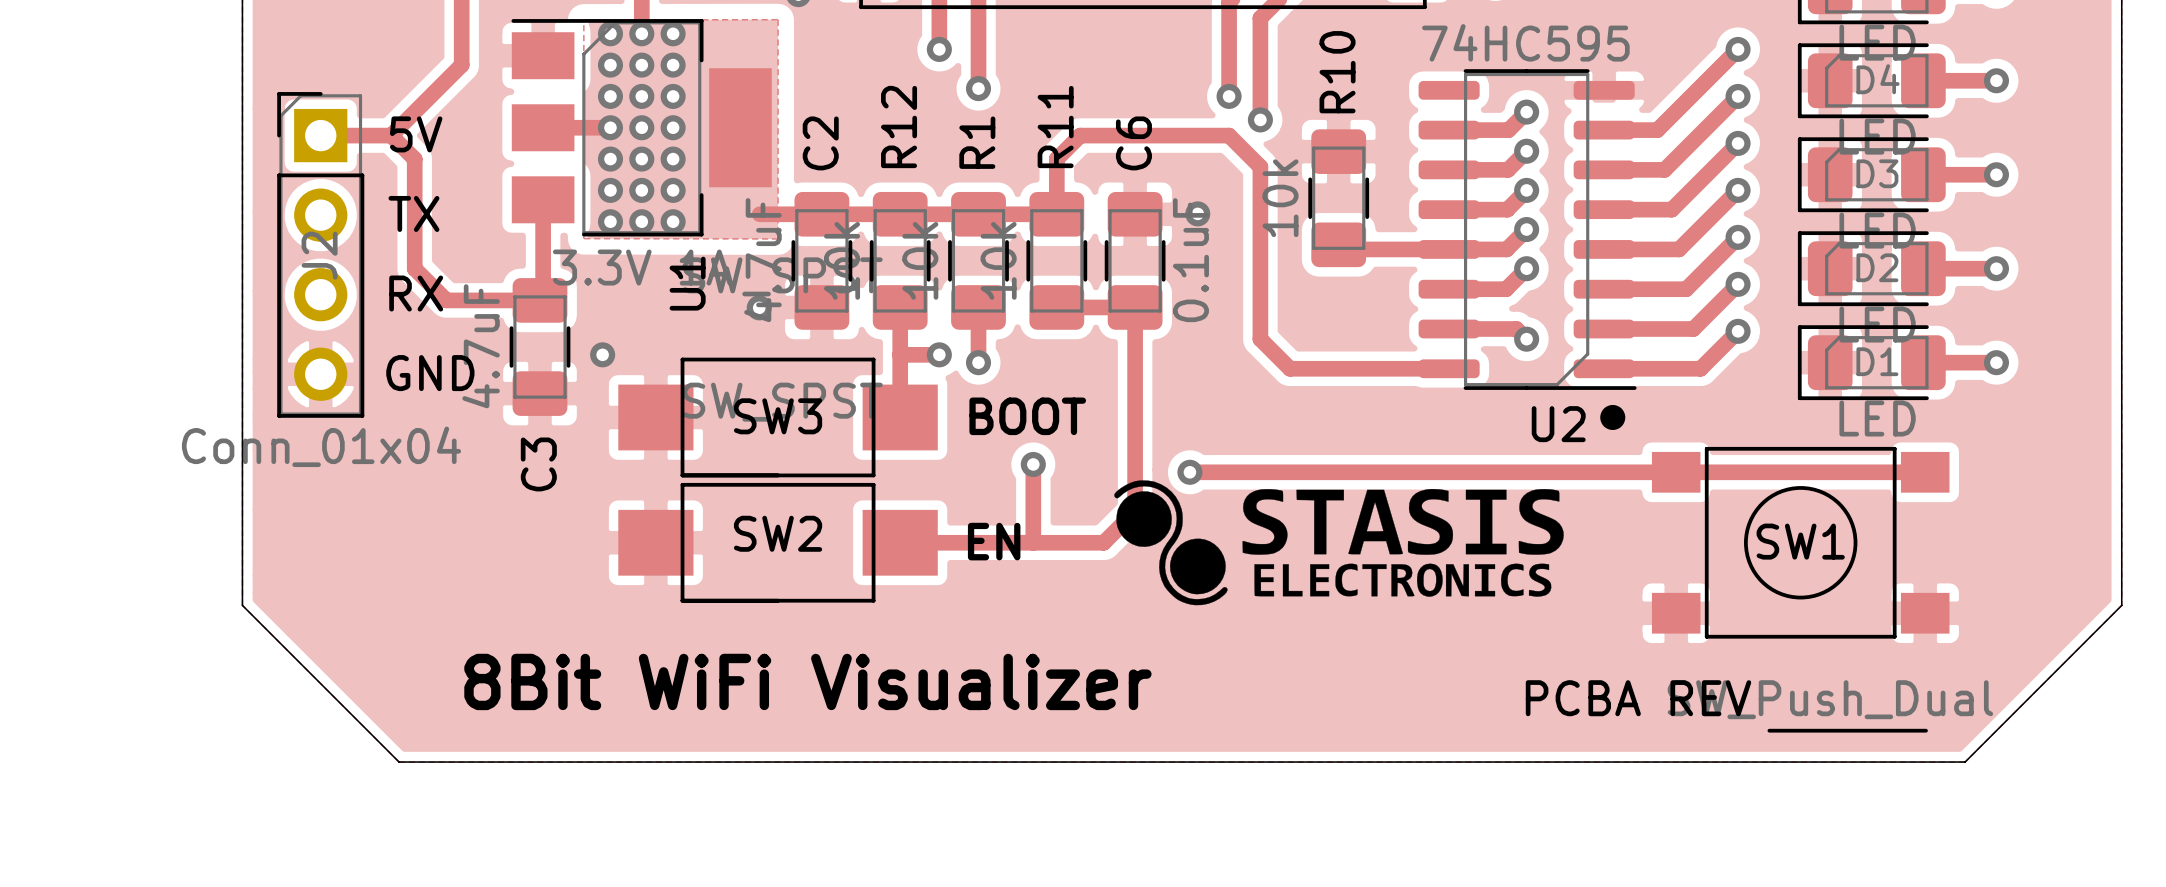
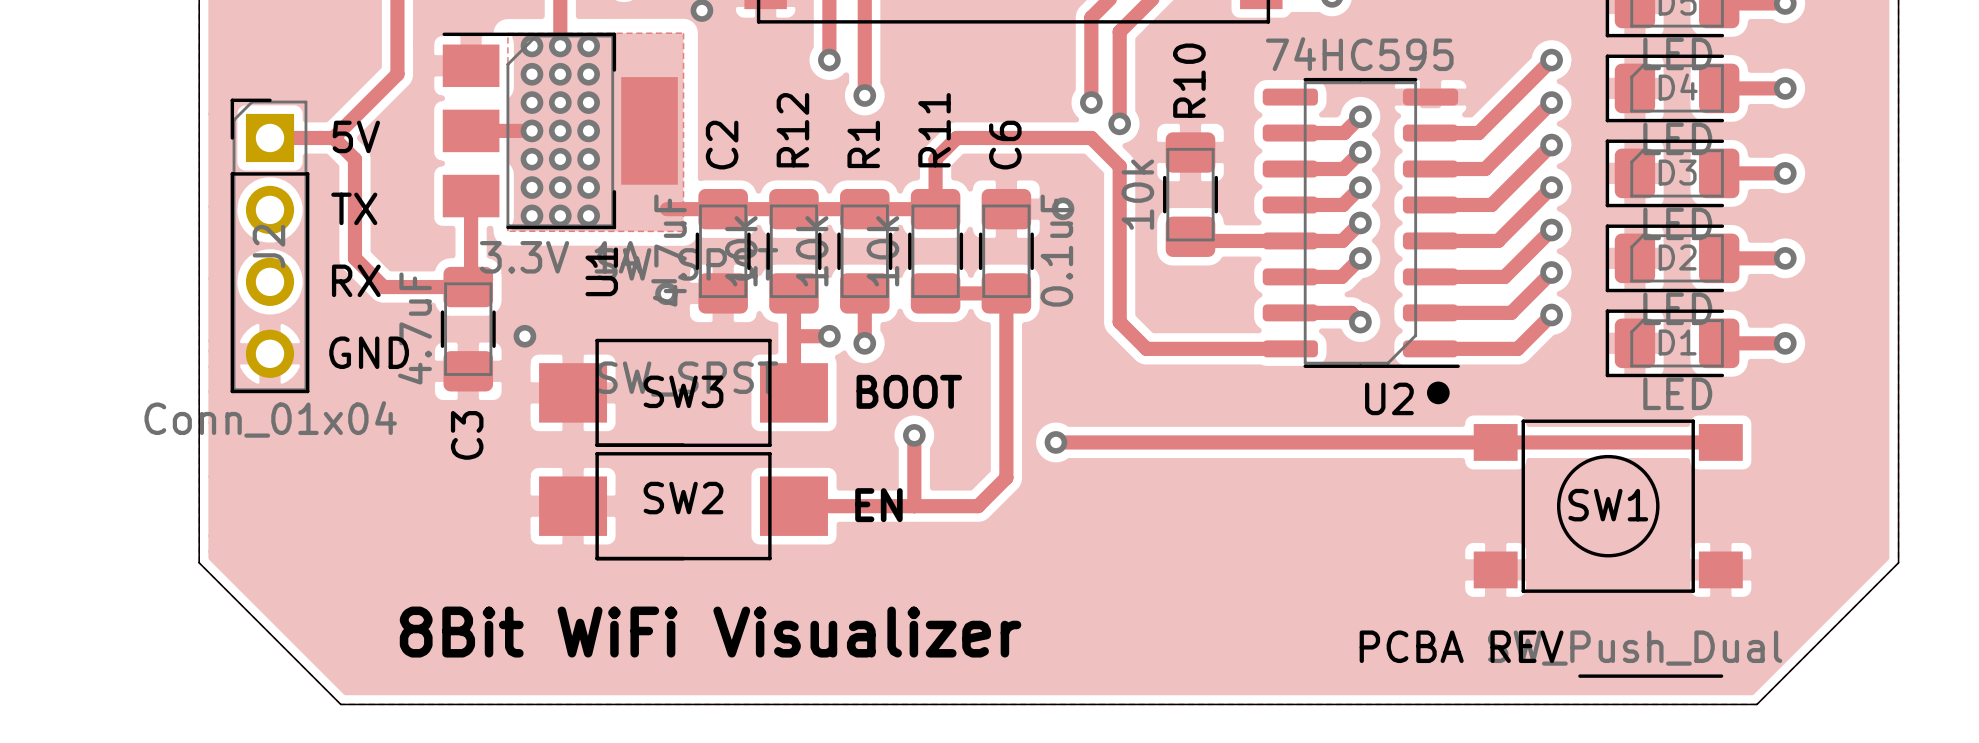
drawing: [1114, 480, 1564, 606] -> none

